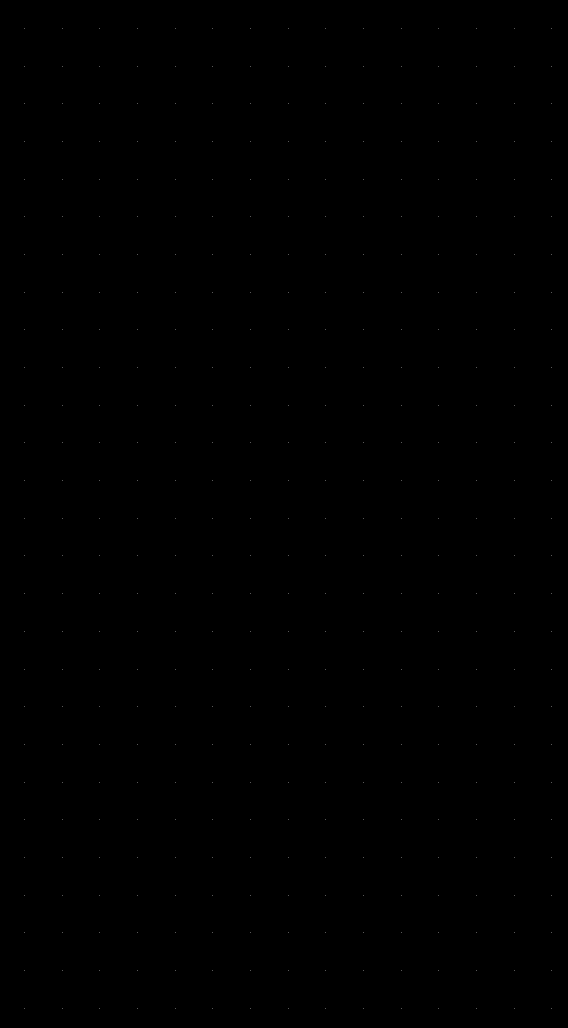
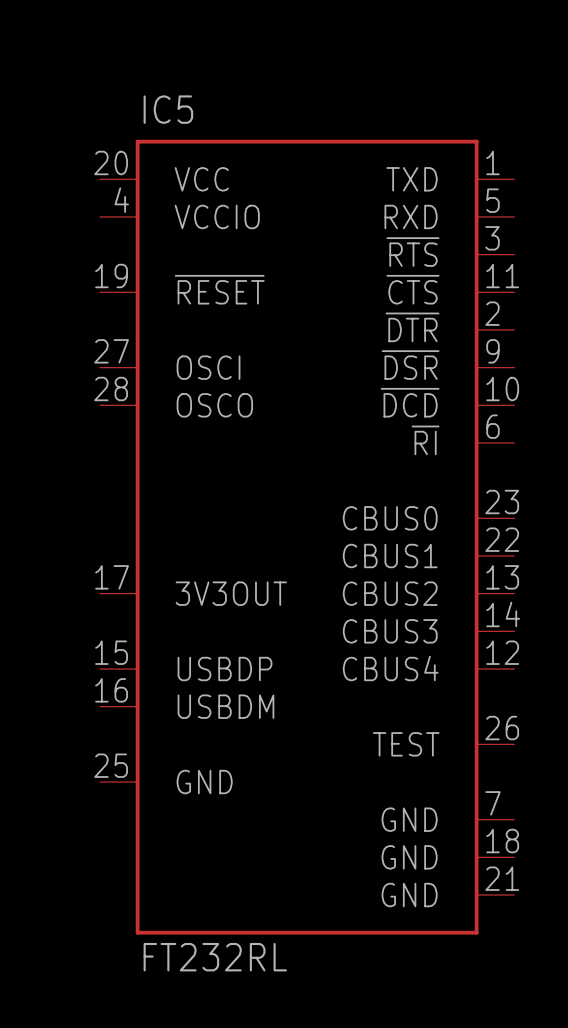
IC5: none -> FT232RL (307, 537)

